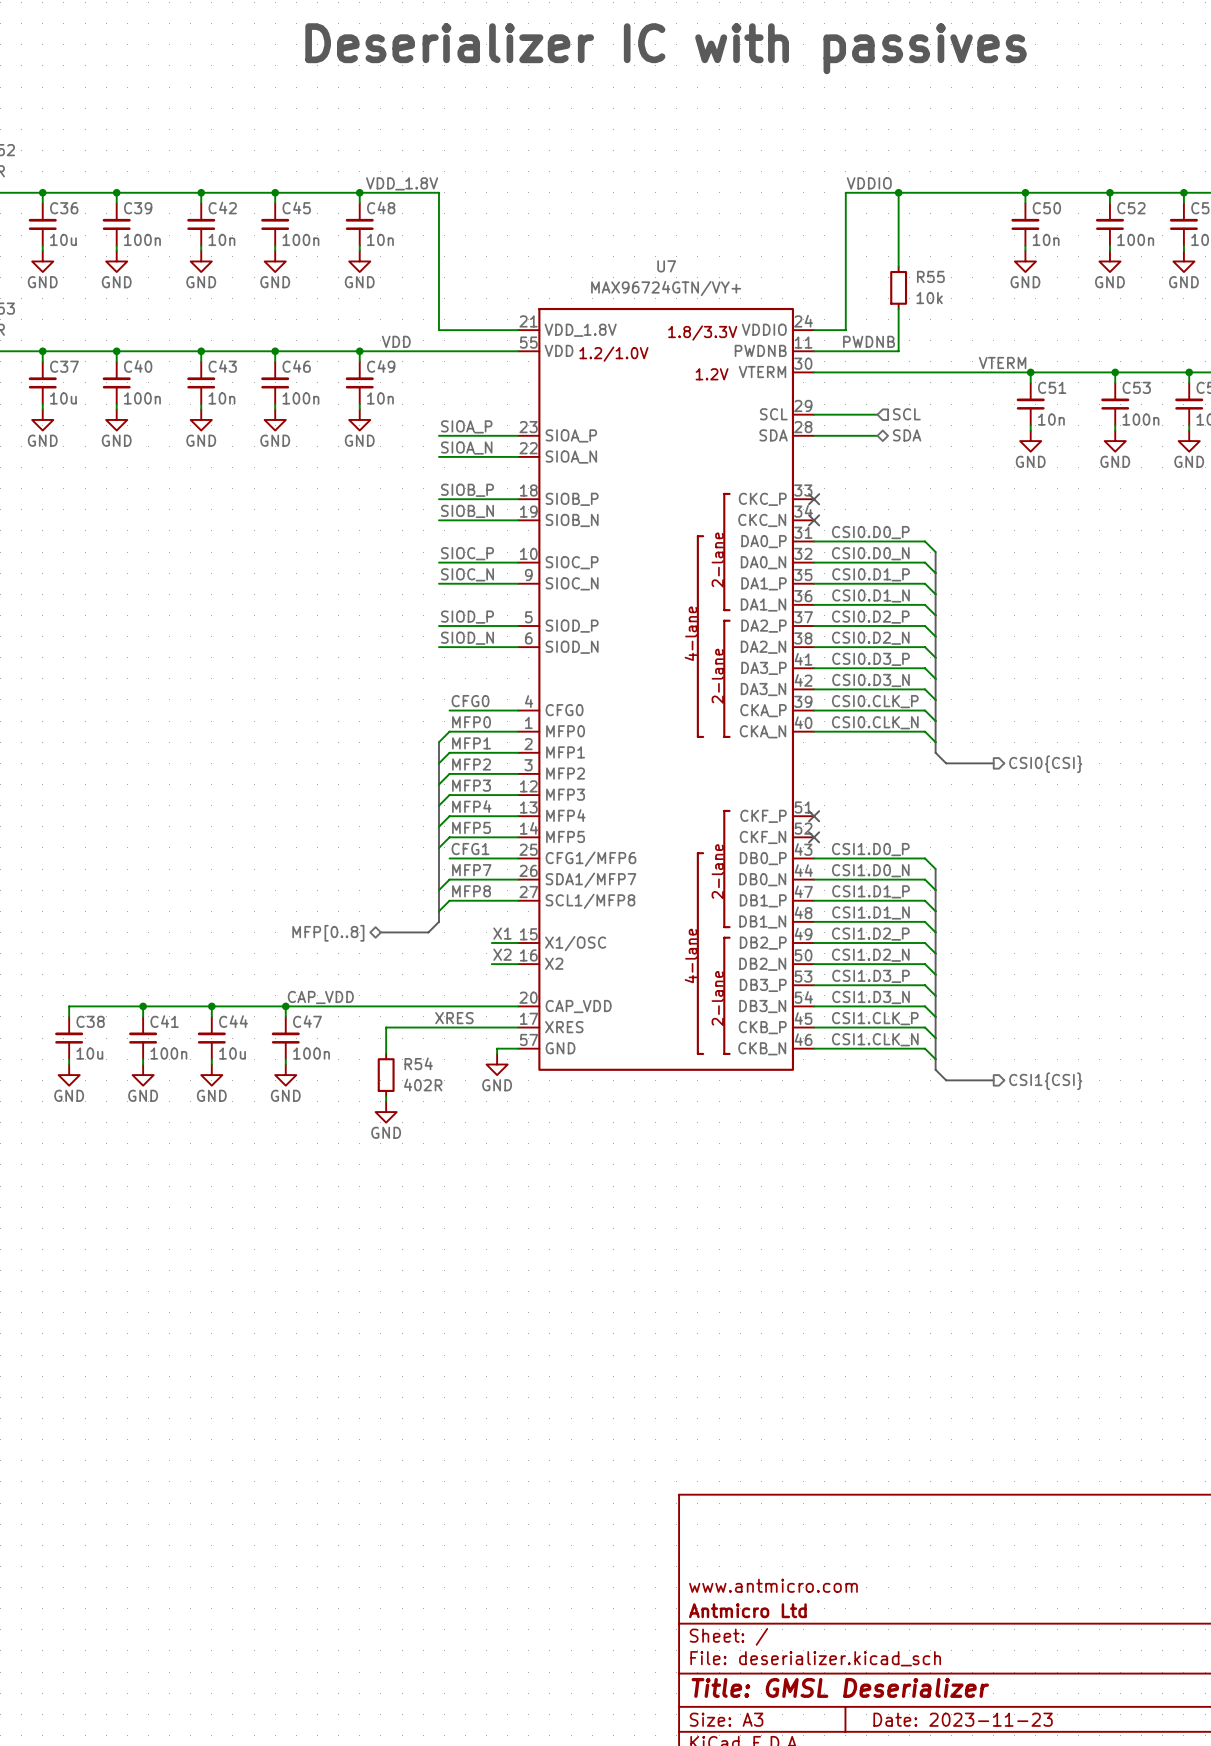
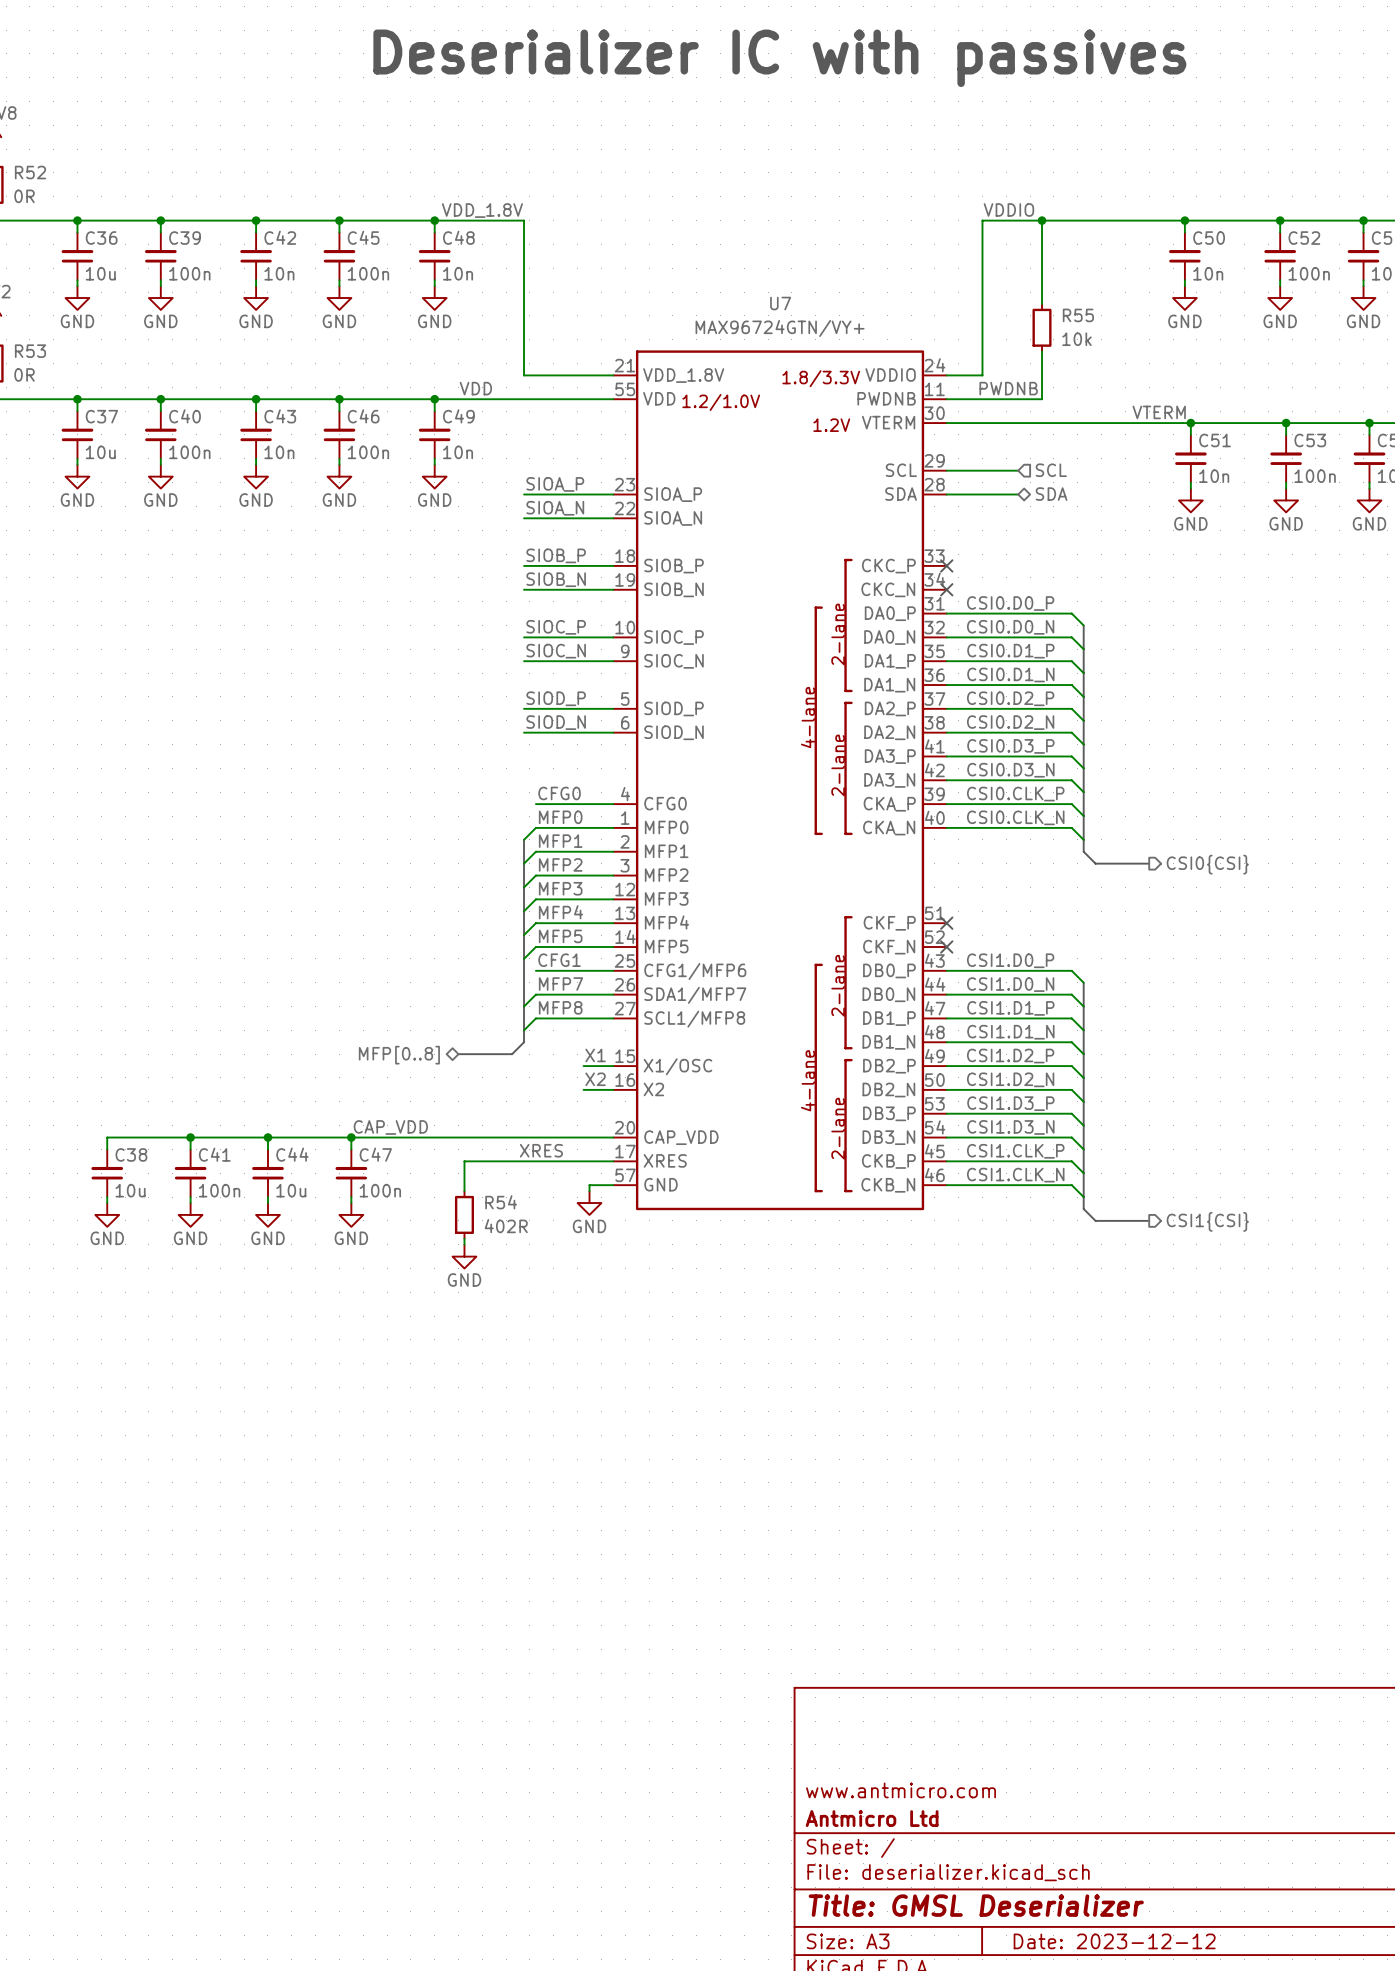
title block: Date: 2023-11-23 (963, 1719) -> Date: 2023-12-12 (1114, 1941)

